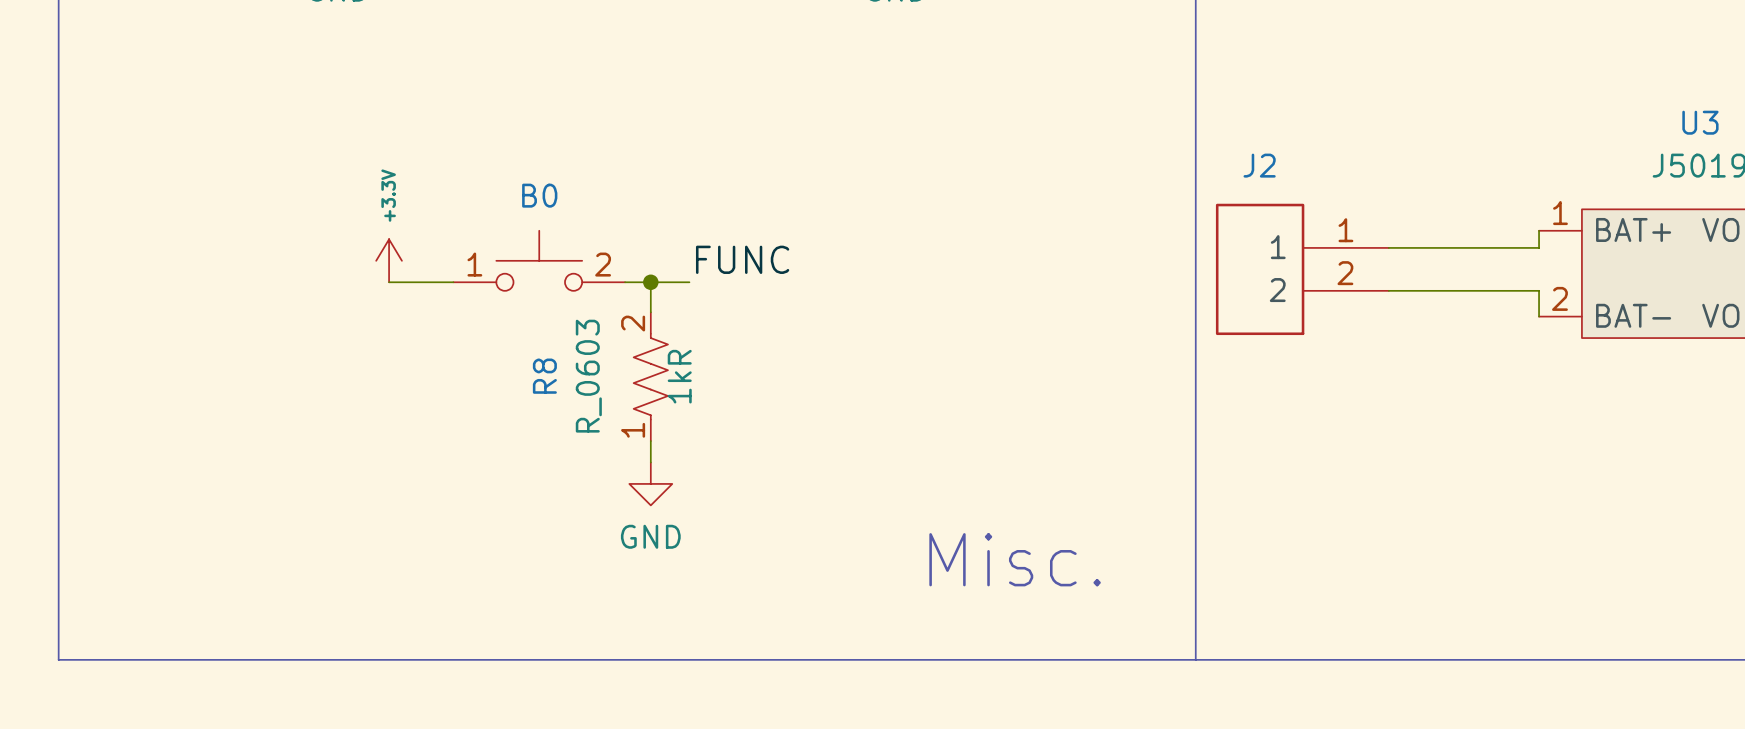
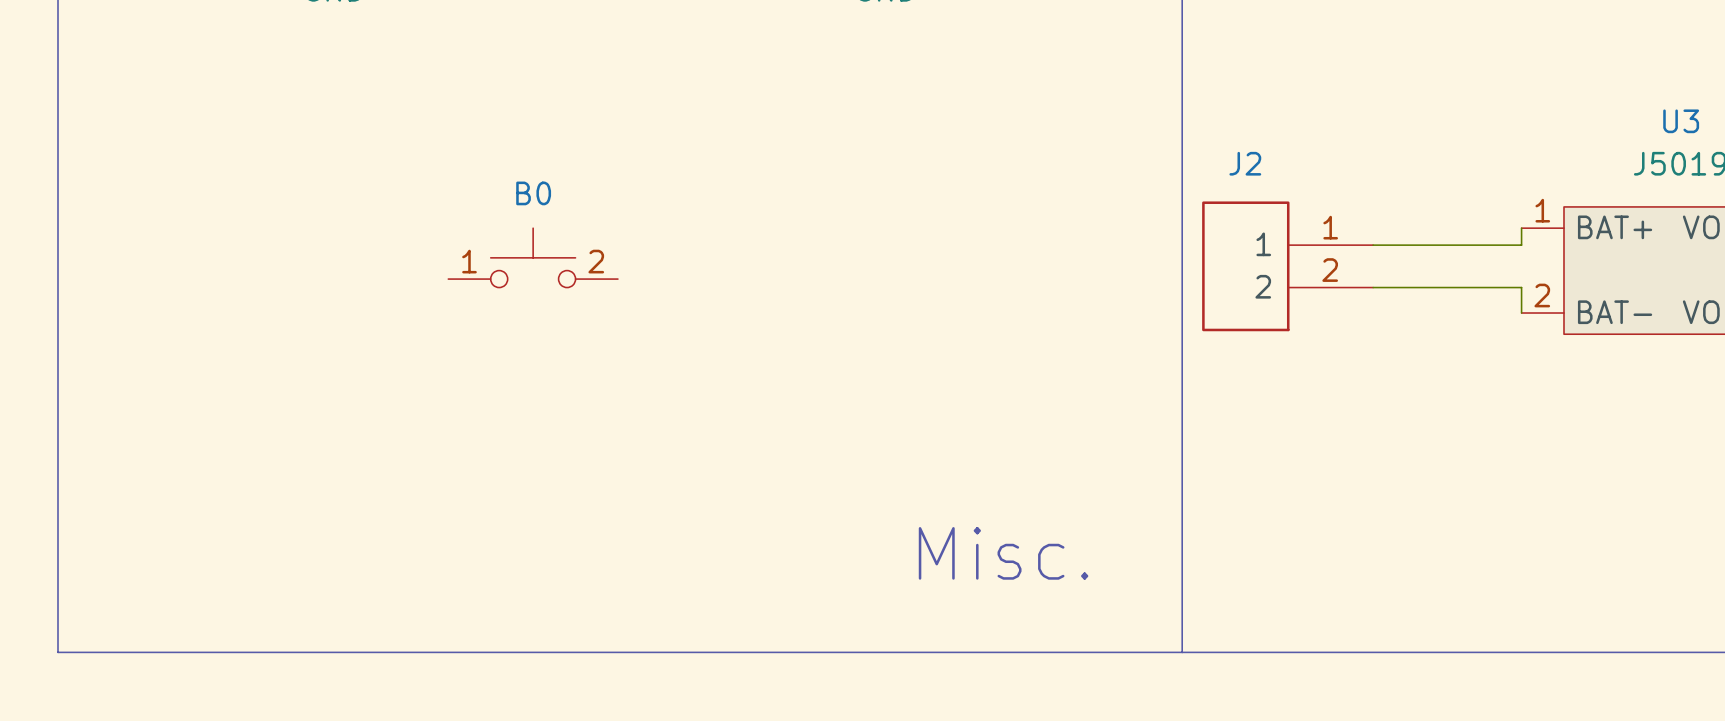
label: FUNC (742, 259) -> none
power symbol: +3.3V (389, 260) -> none
wire: (389, 282) (453, 282) -> none
wire: (625, 282) (689, 282) -> none
wire: (650, 282) (650, 312) -> none
junction: (650, 282) -> none
R8: R_0603 (650, 376) -> none
wire: (650, 441) (650, 462) -> none
power symbol: GND (650, 483) -> none

